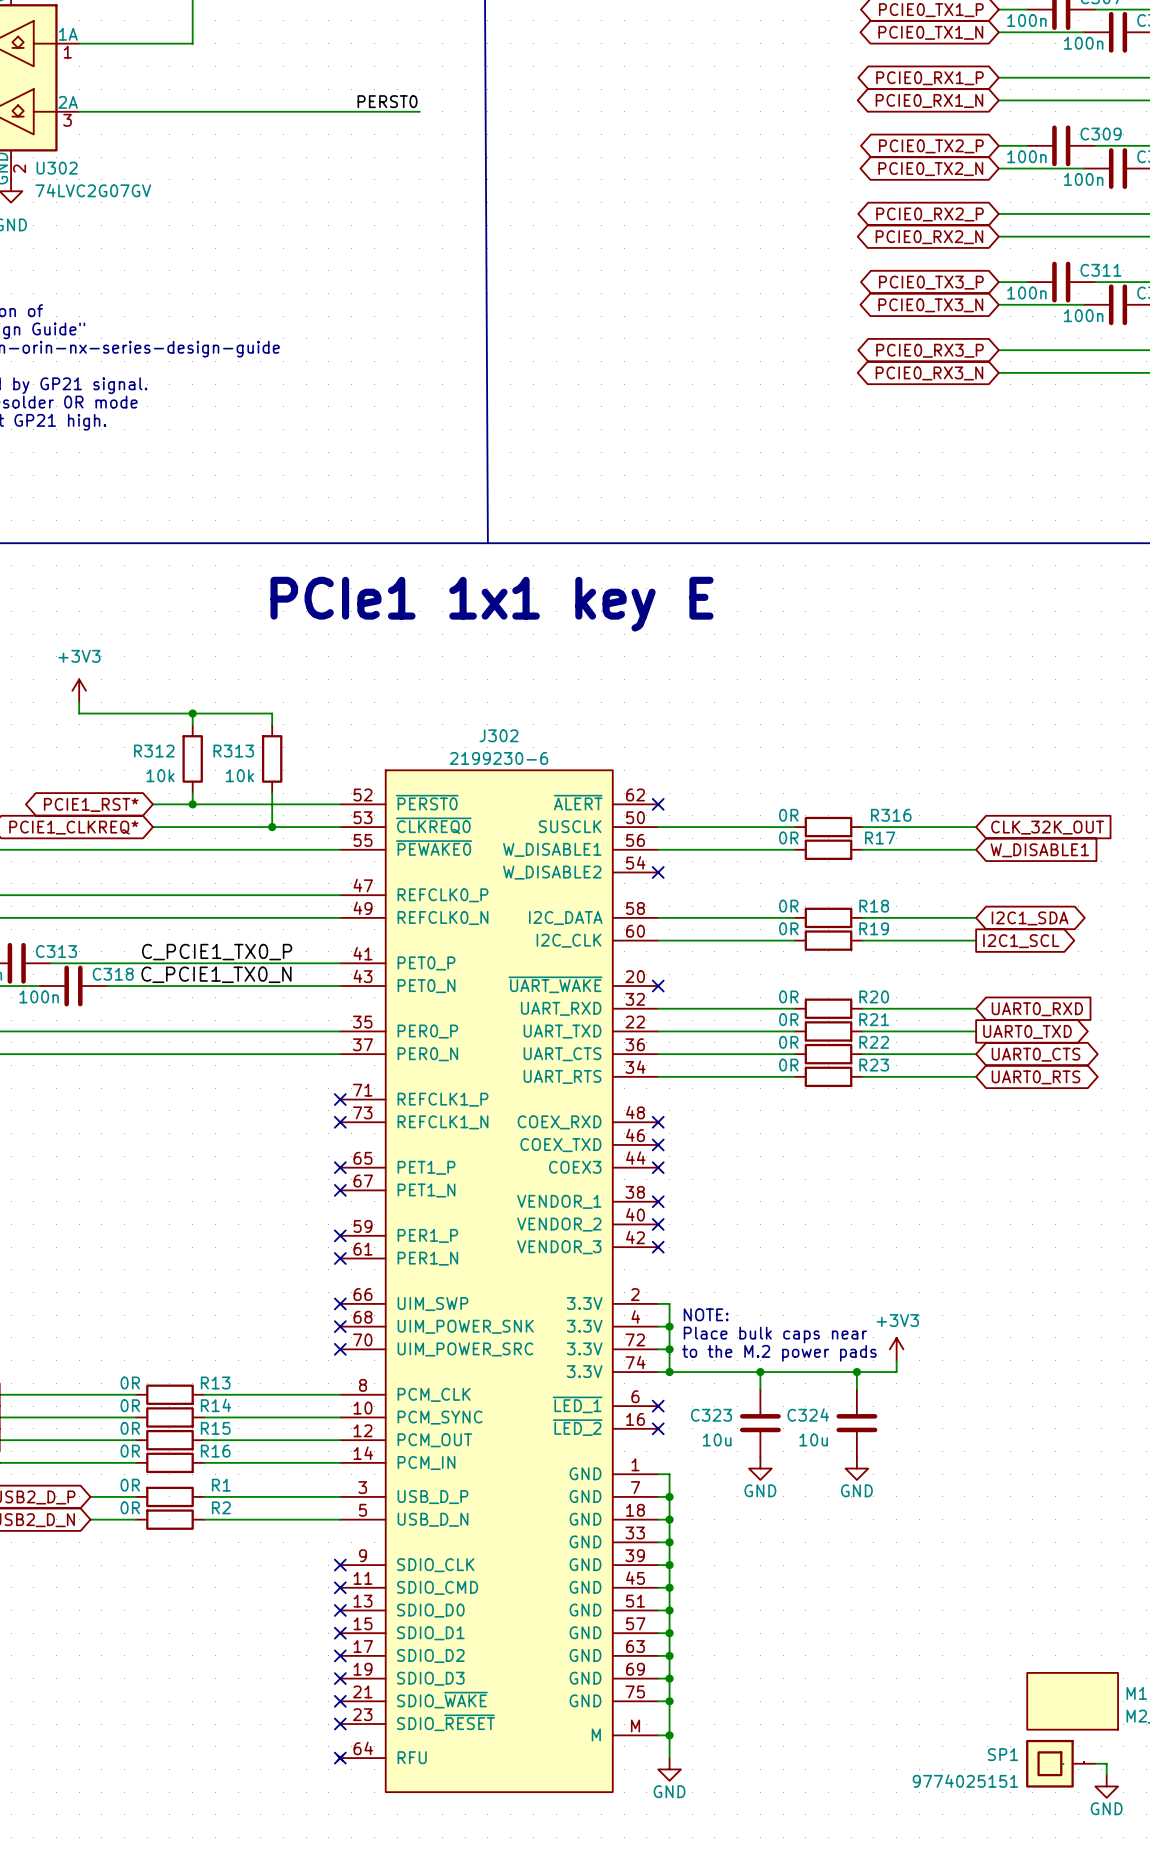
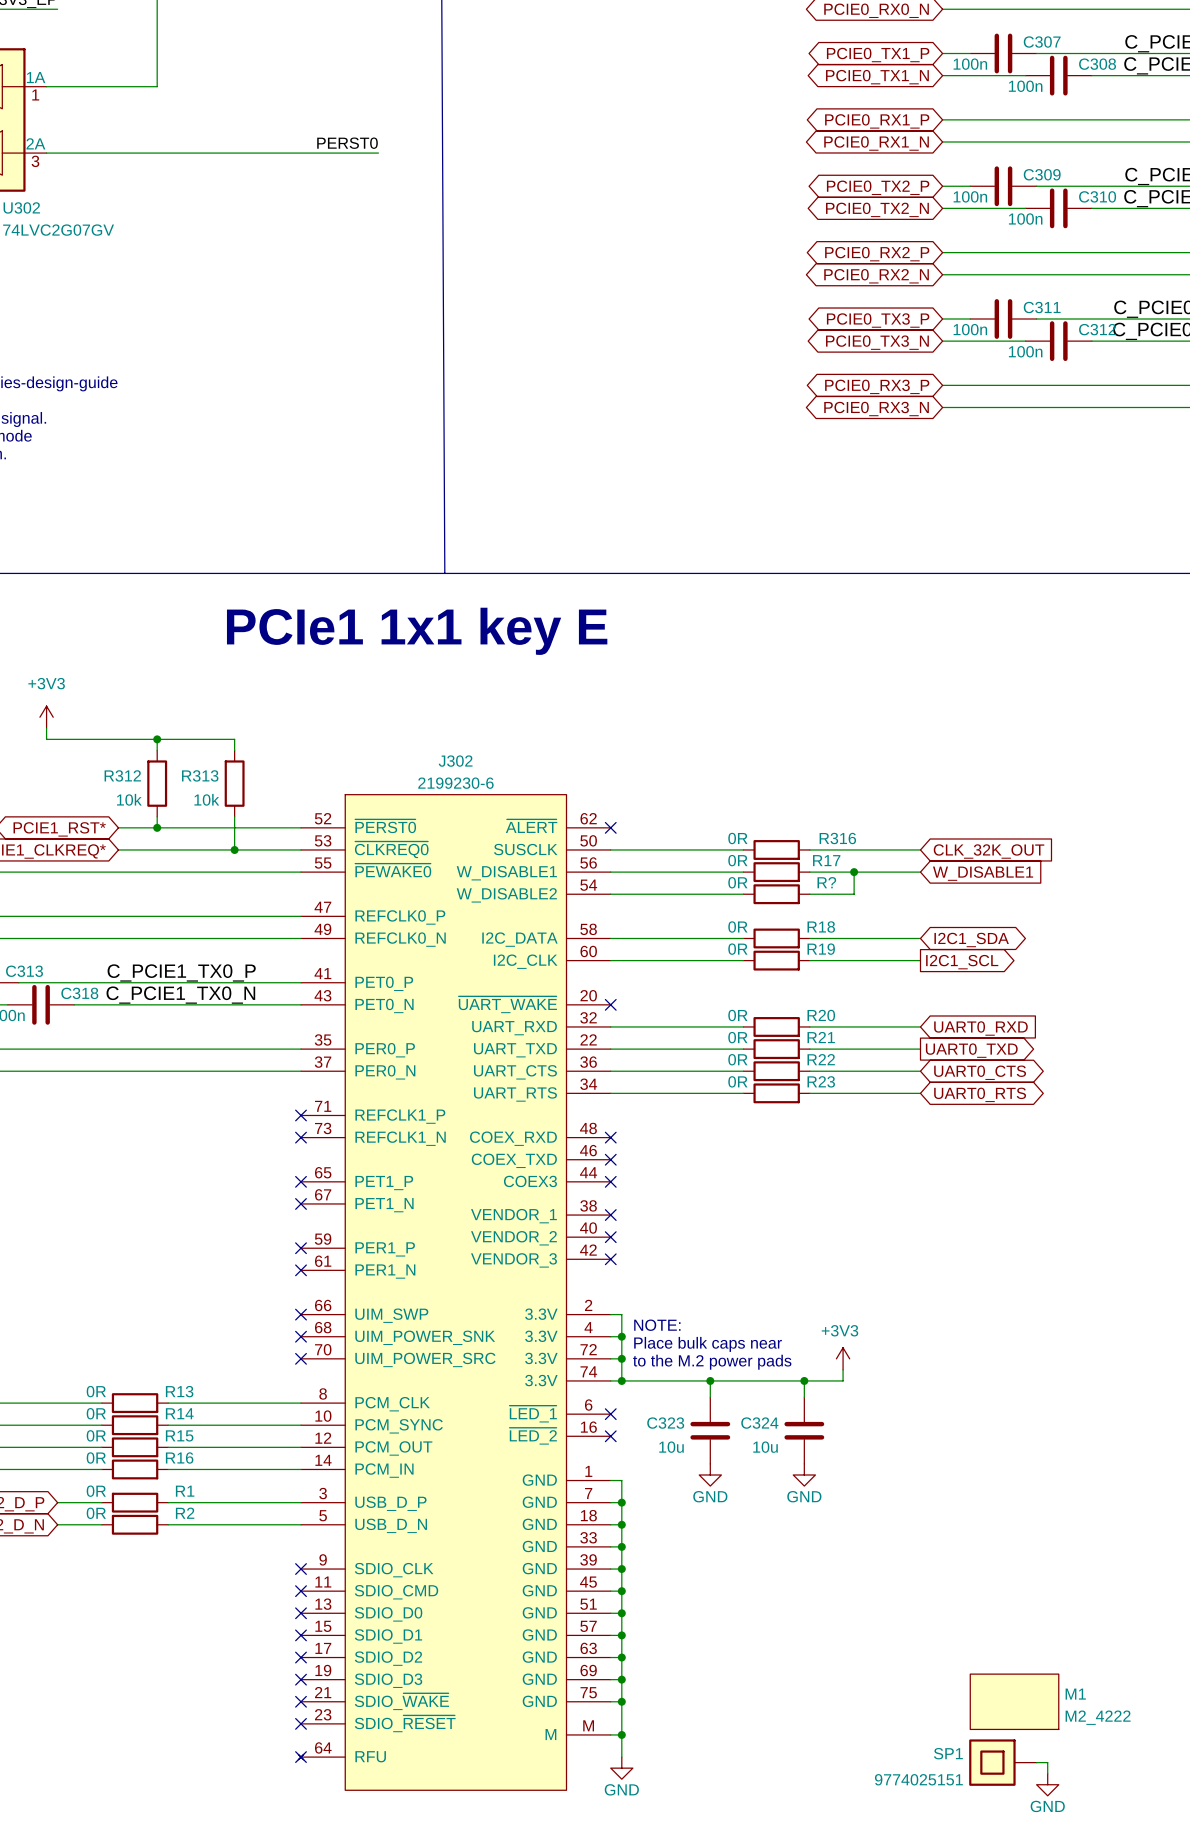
wire: none -> (854, 872) (854, 894) (809, 894)
junction: none -> (854, 872)
wire: none -> (610, 894) (743, 894)
no-connect mark: (658, 872) -> none
R?: none -> (776, 894)

